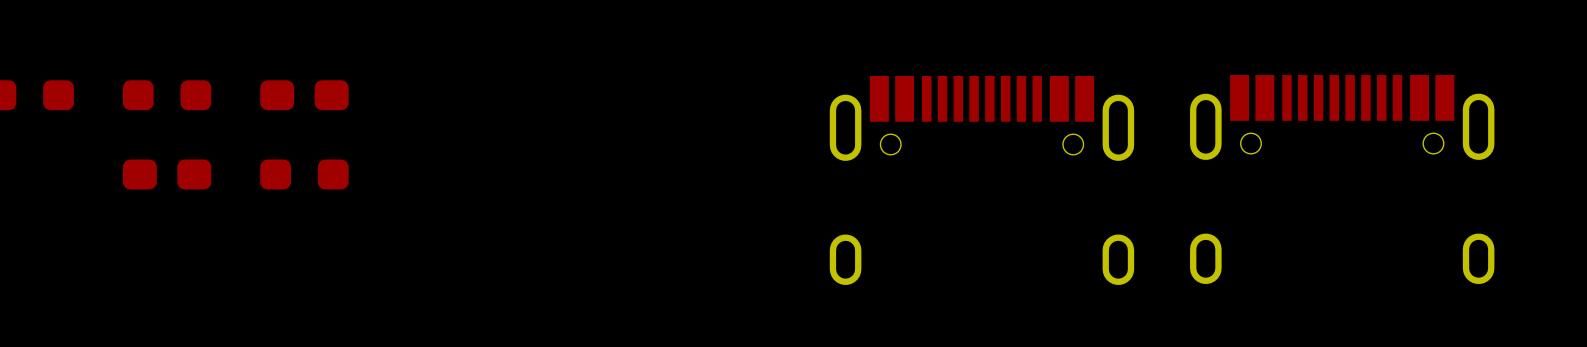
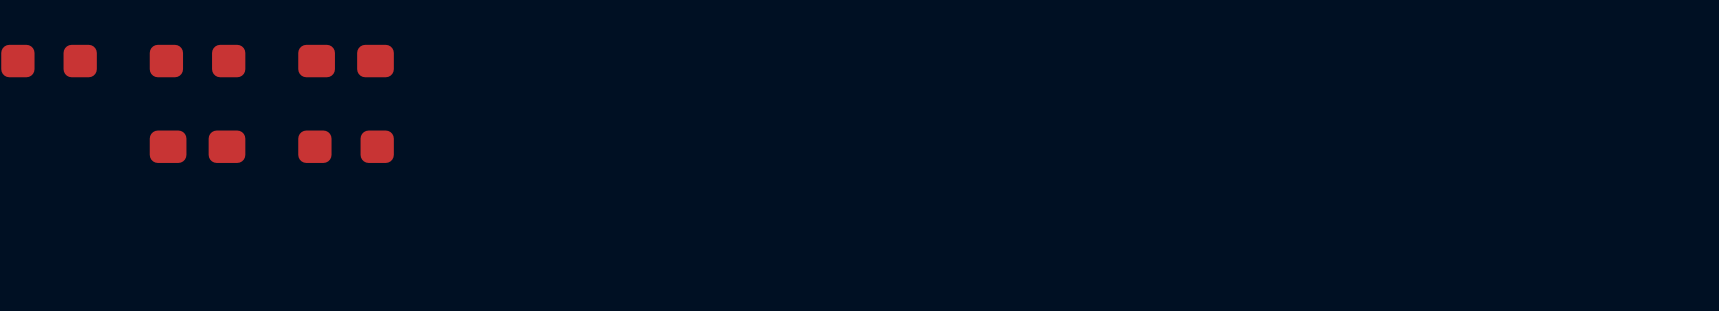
part: (1342, 179) -> none
part: (981, 180) -> none

